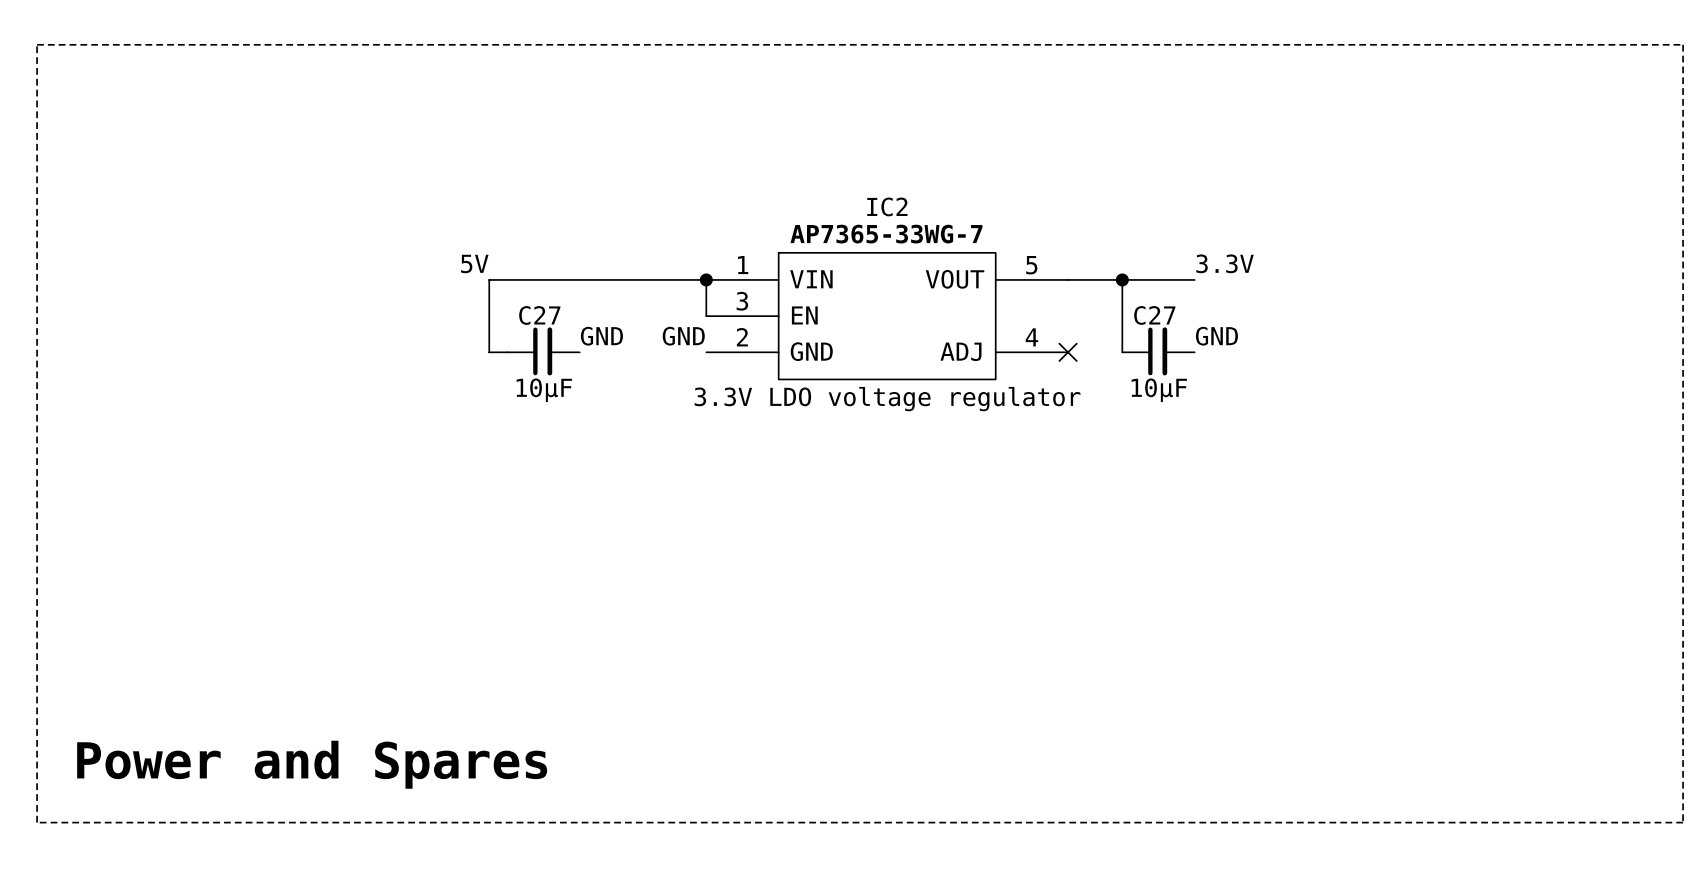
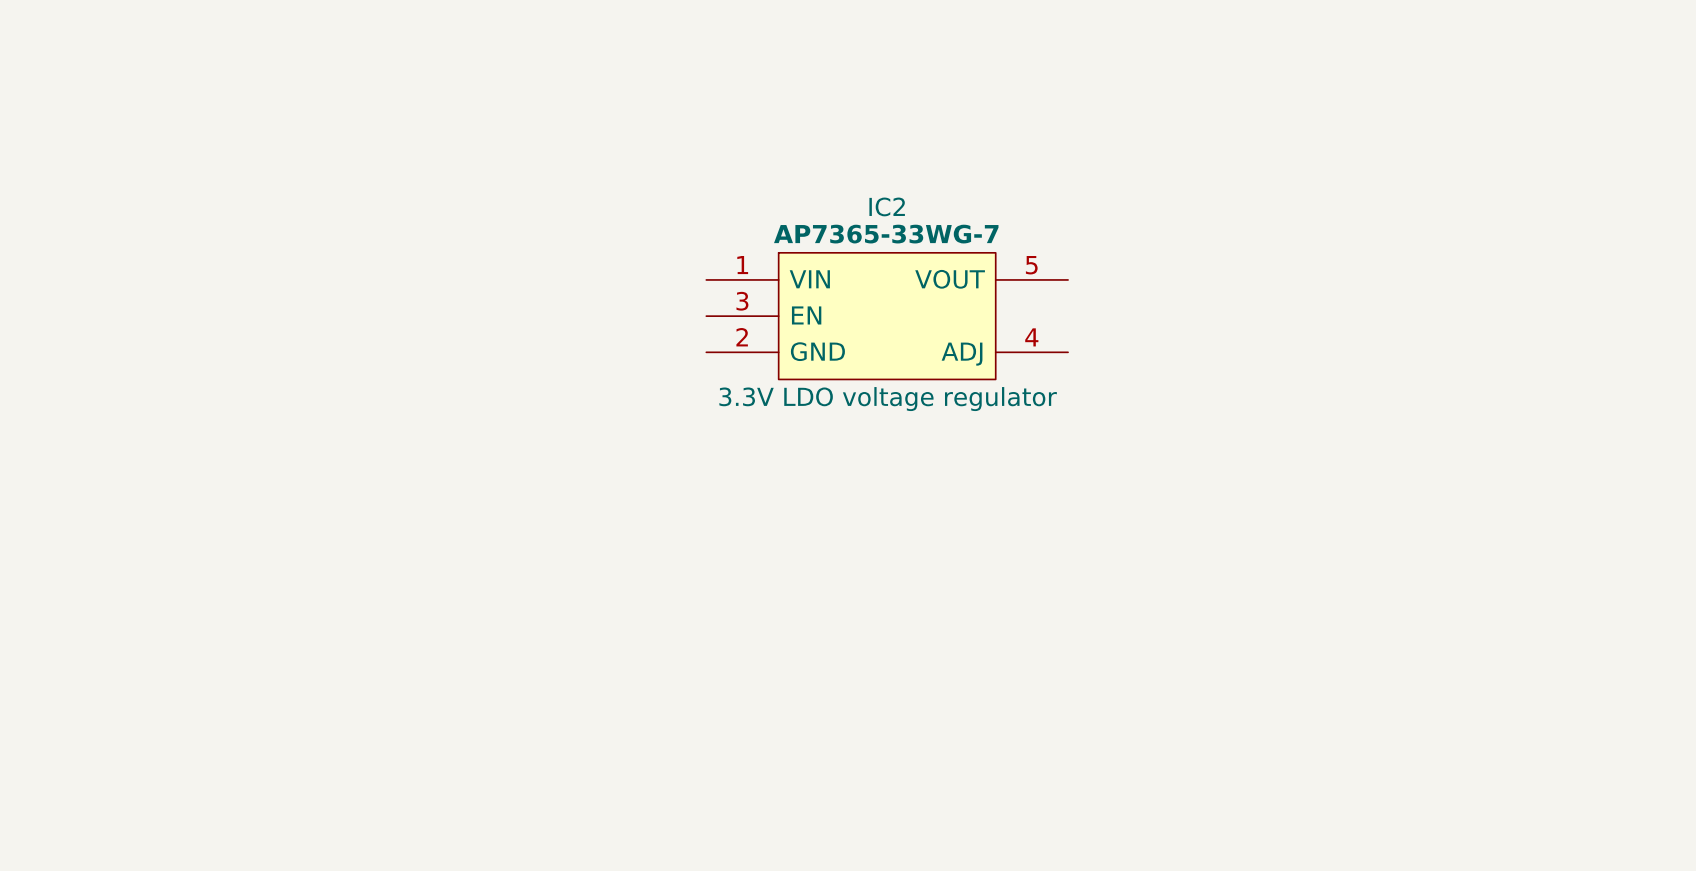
line: (37, 44) (1683, 44) (1683, 822) (37, 822) (37, 44) -> none
label: 3.3V (1225, 263) -> none
label: 5V (474, 264) -> none
junction: (706, 279) -> none
wire: (1068, 279) (1194, 279) -> none
wire: (1122, 279) (1122, 352) -> none
junction: (1122, 279) -> none
wire: (706, 316) (706, 279) (489, 279) (489, 352) (507, 352) -> none
label: GND (601, 336) -> none
label: GND (683, 336) -> none
label: GND (1216, 336) -> none
C27: 10μF (543, 351) -> none
C27: 10μF (1158, 351) -> none
no-connect mark: (1068, 352) -> none
text: Power and Spares (312, 764) -> none

